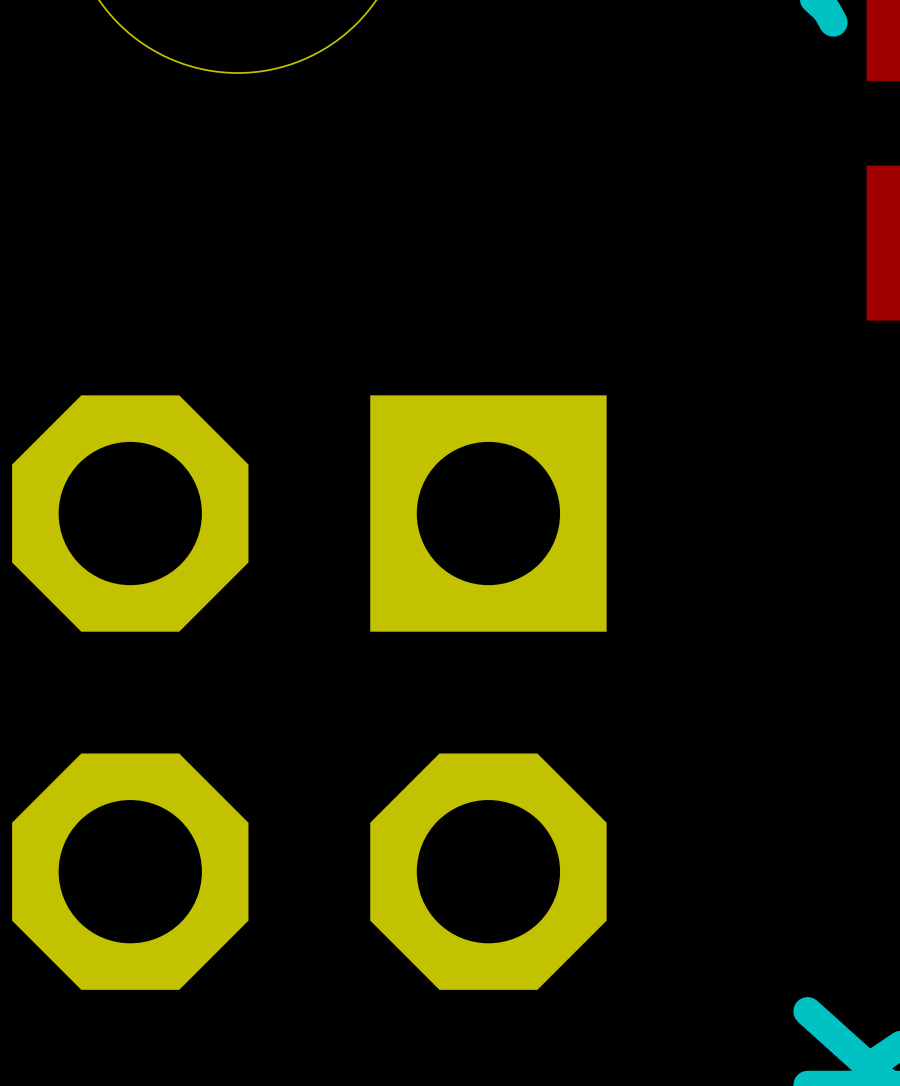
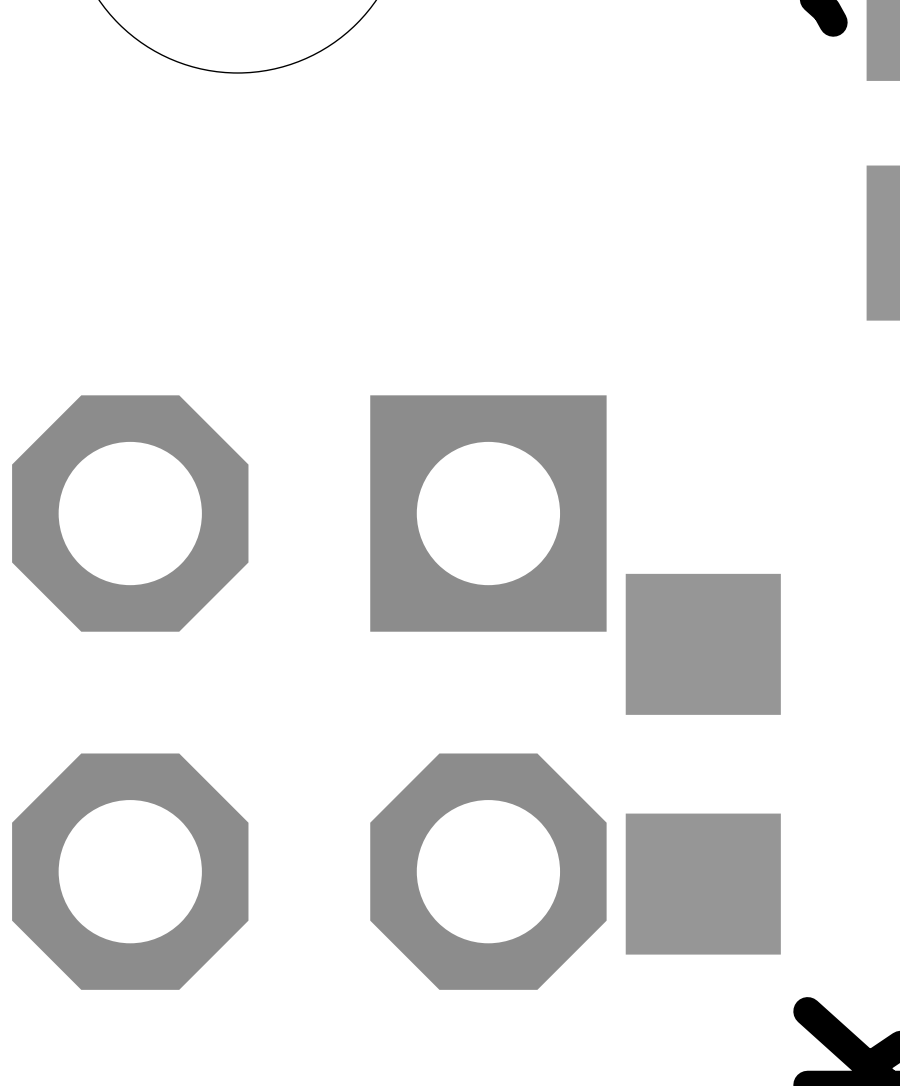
part: none -> (703, 764)

